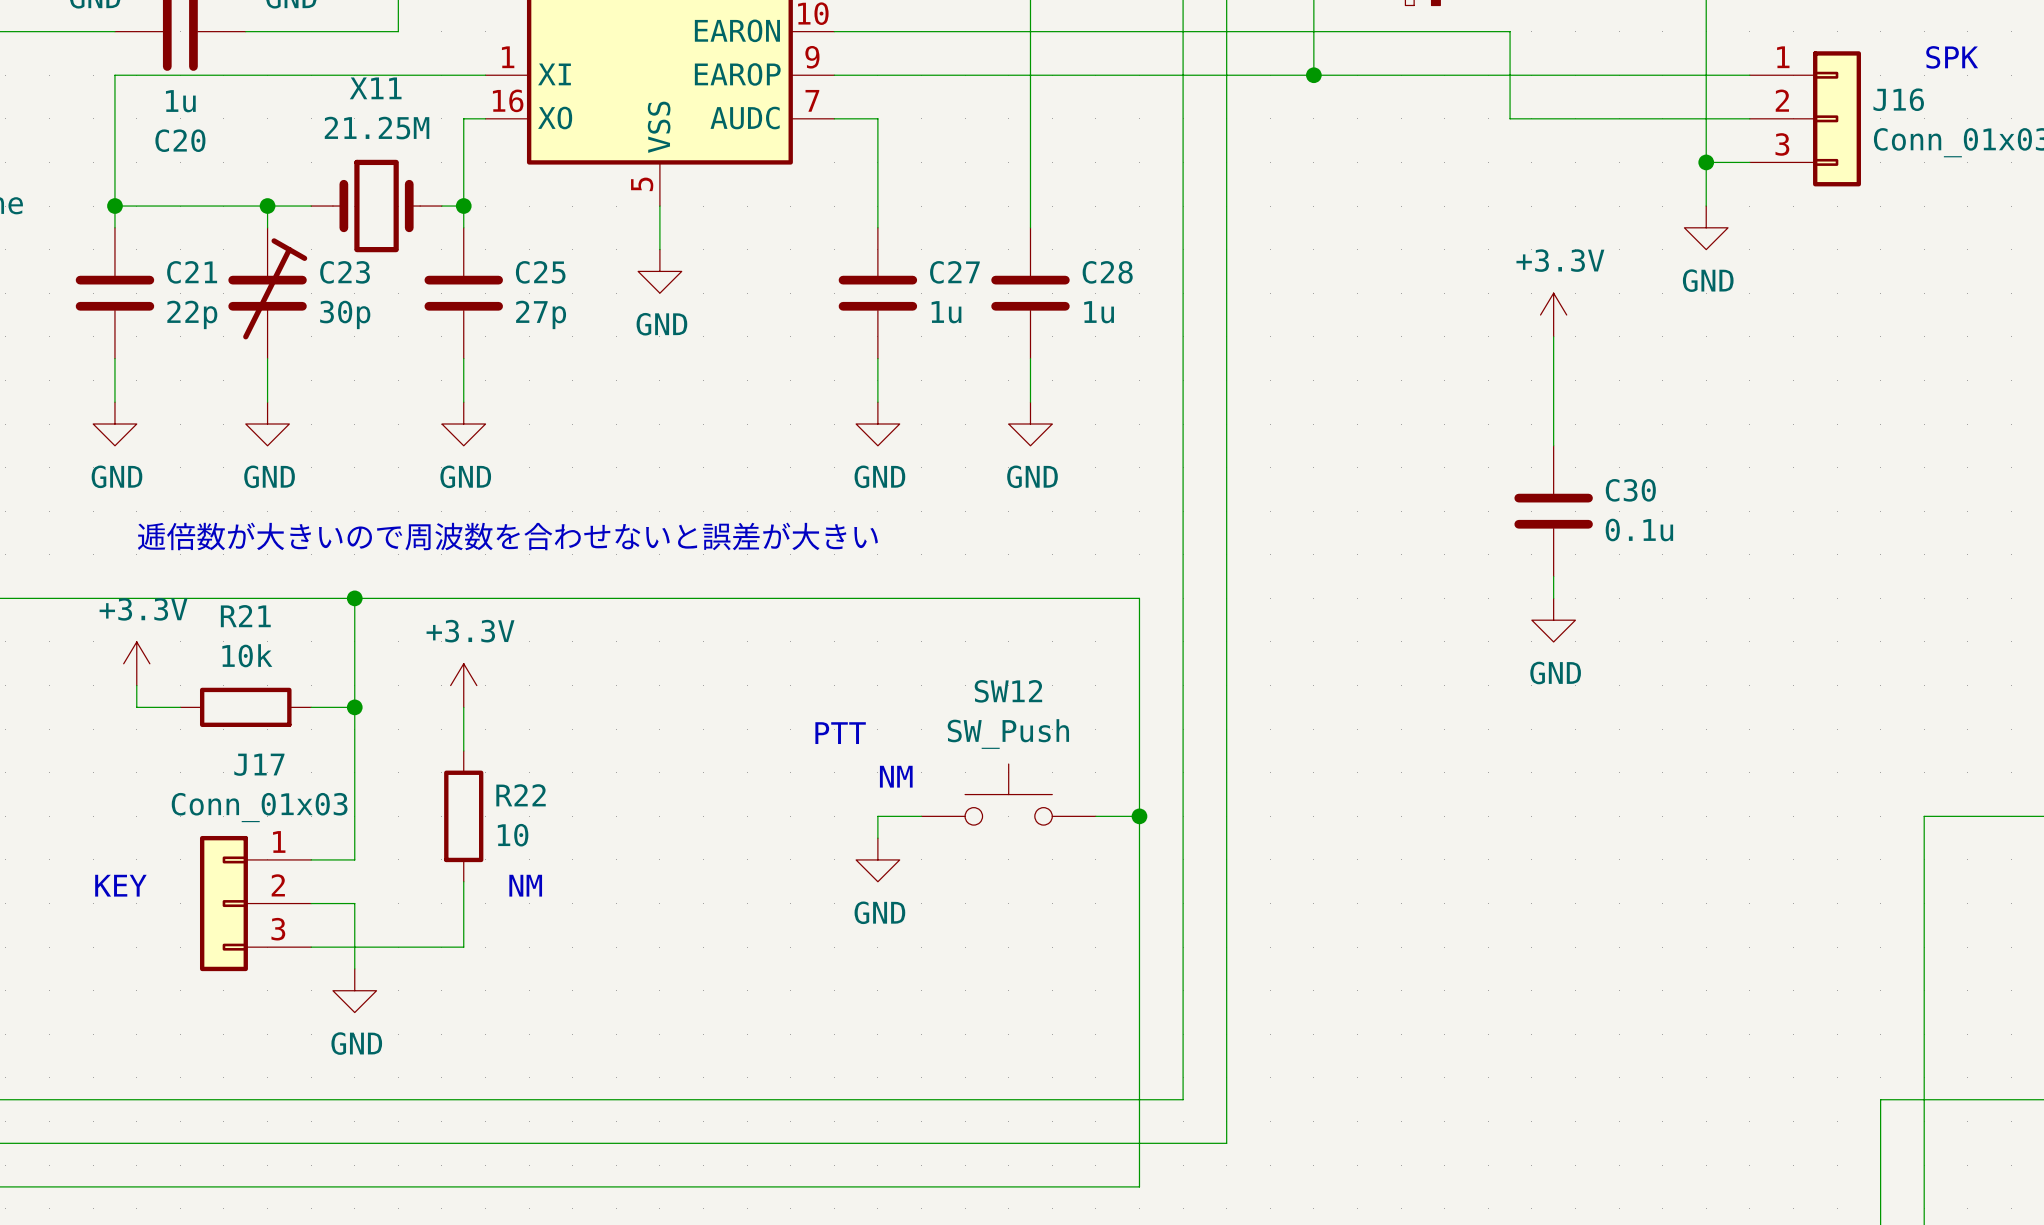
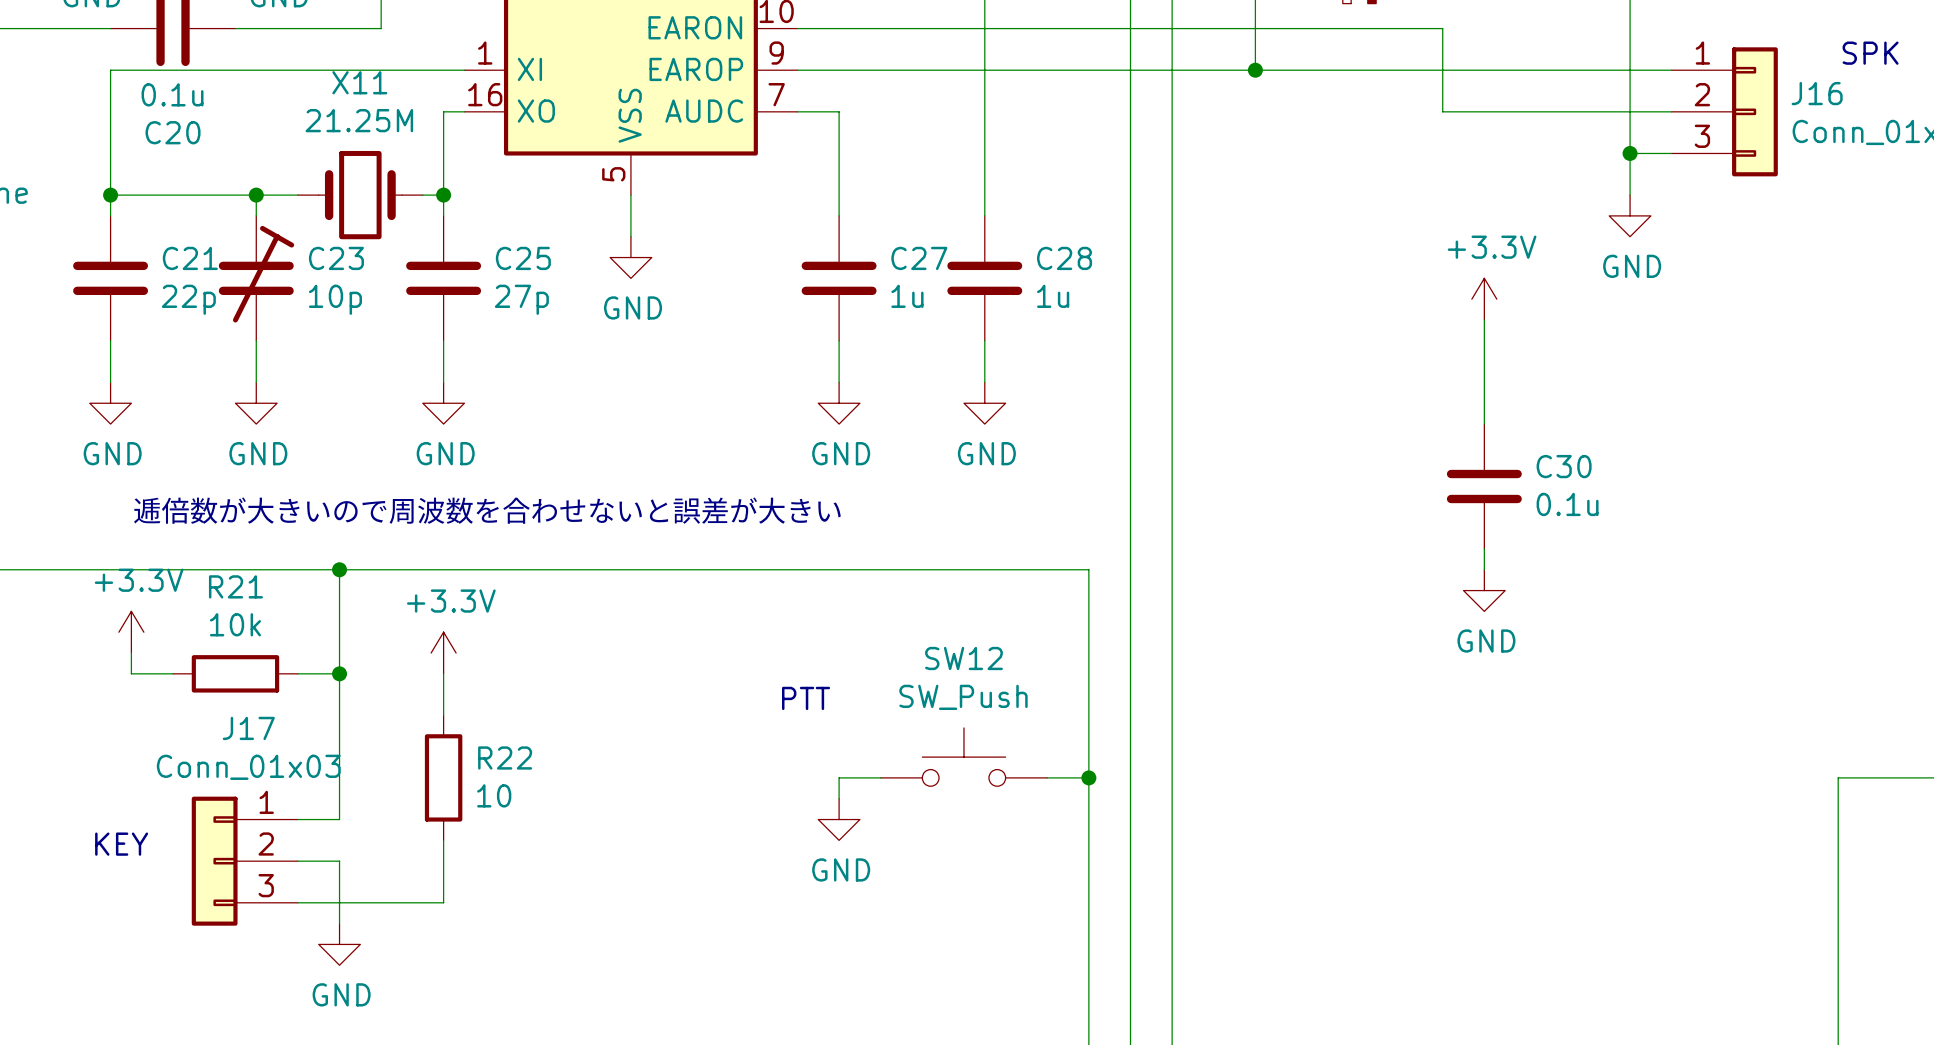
C20 value: 1u (180, 101) -> 0.1u (172, 94)
C23 value: 30p (345, 314) -> 10p (335, 299)
text: NM (896, 776) -> none
text: NM (525, 885) -> none

